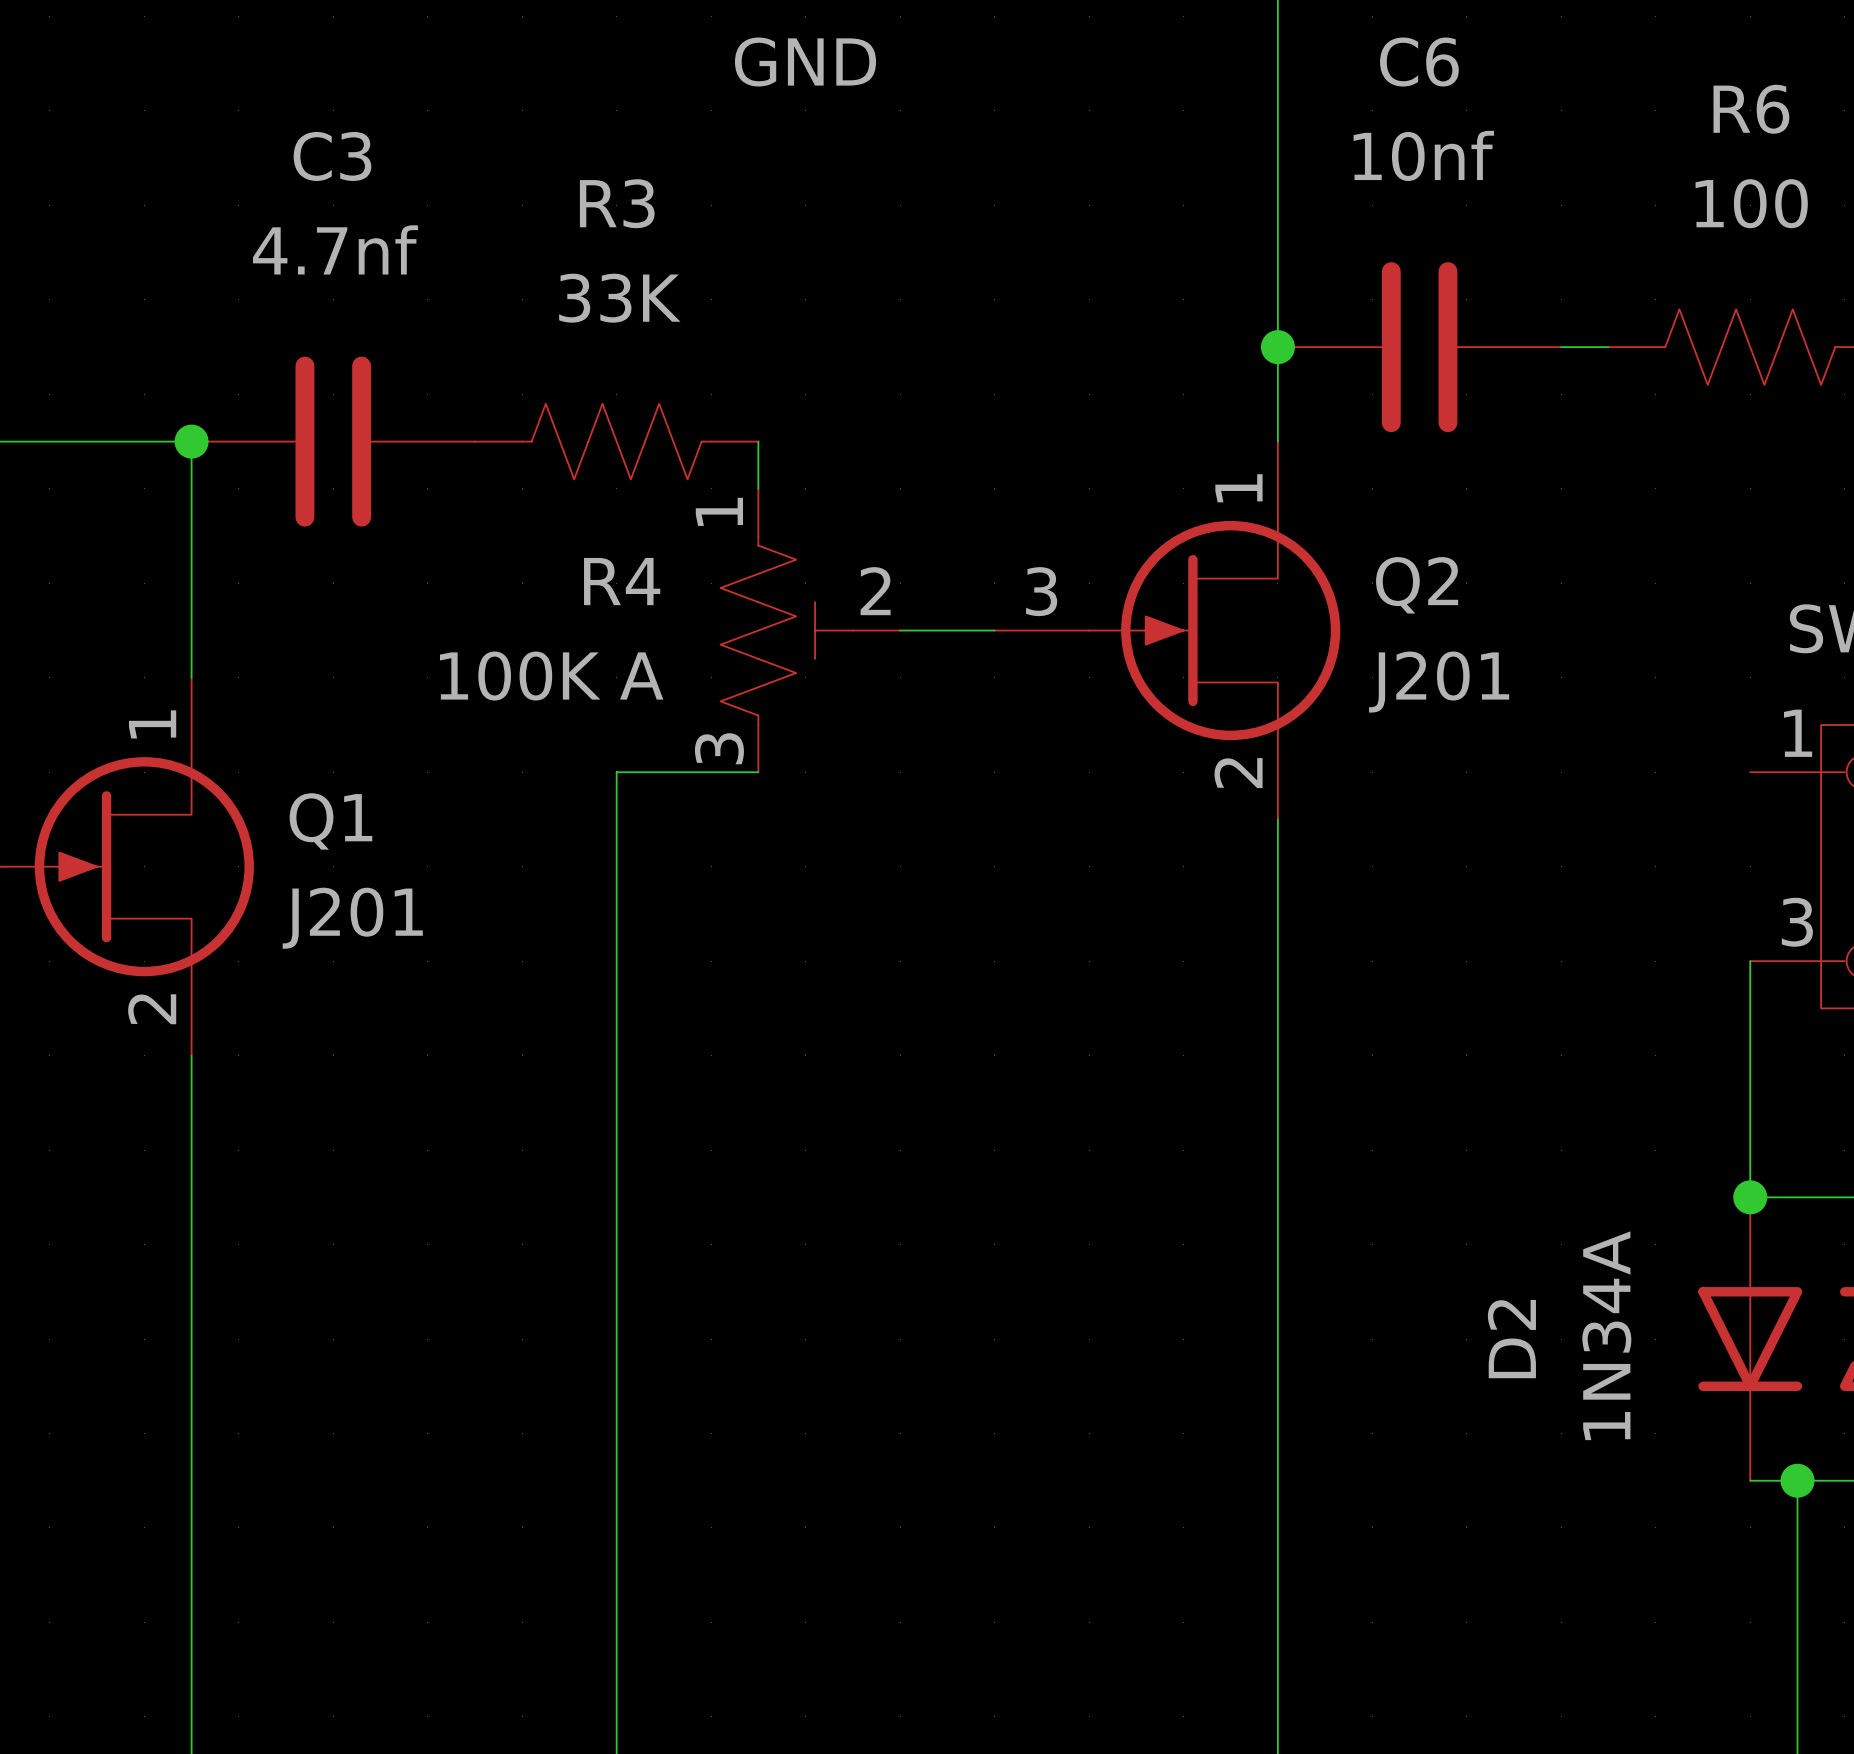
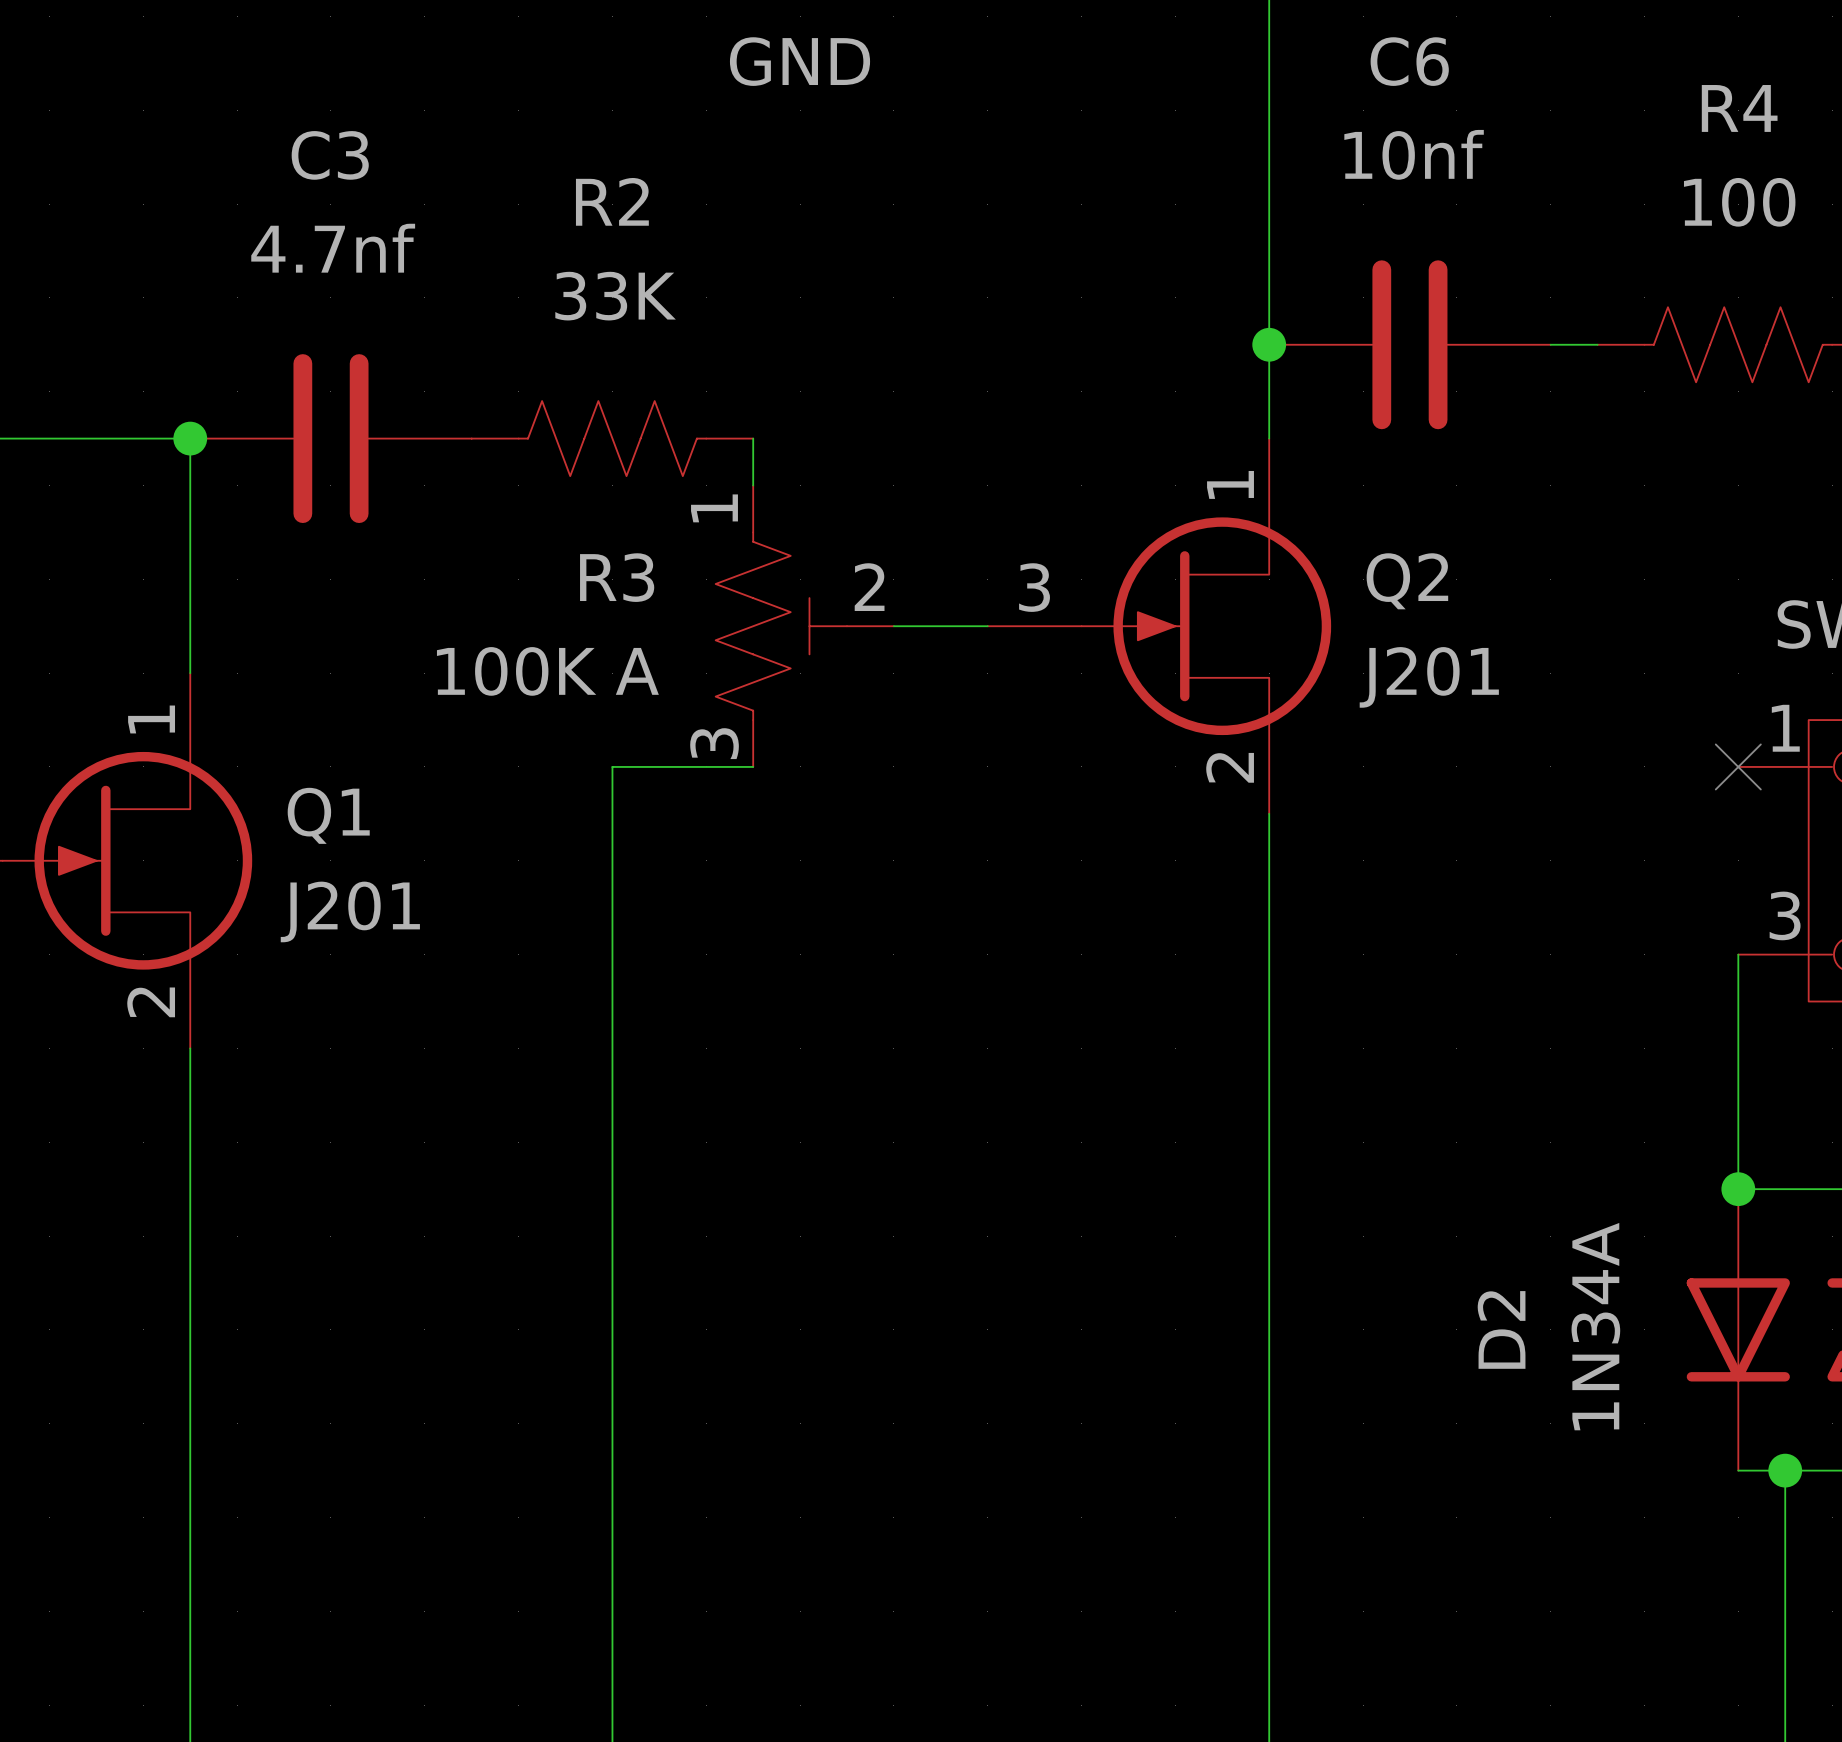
R6 name: R6 (1751, 109) -> R4 (1739, 108)
R3 name: R3 (617, 203) -> R2 (612, 201)
R4 name: R4 (622, 581) -> R3 (617, 577)
no-connect mark: none -> (1738, 766)

